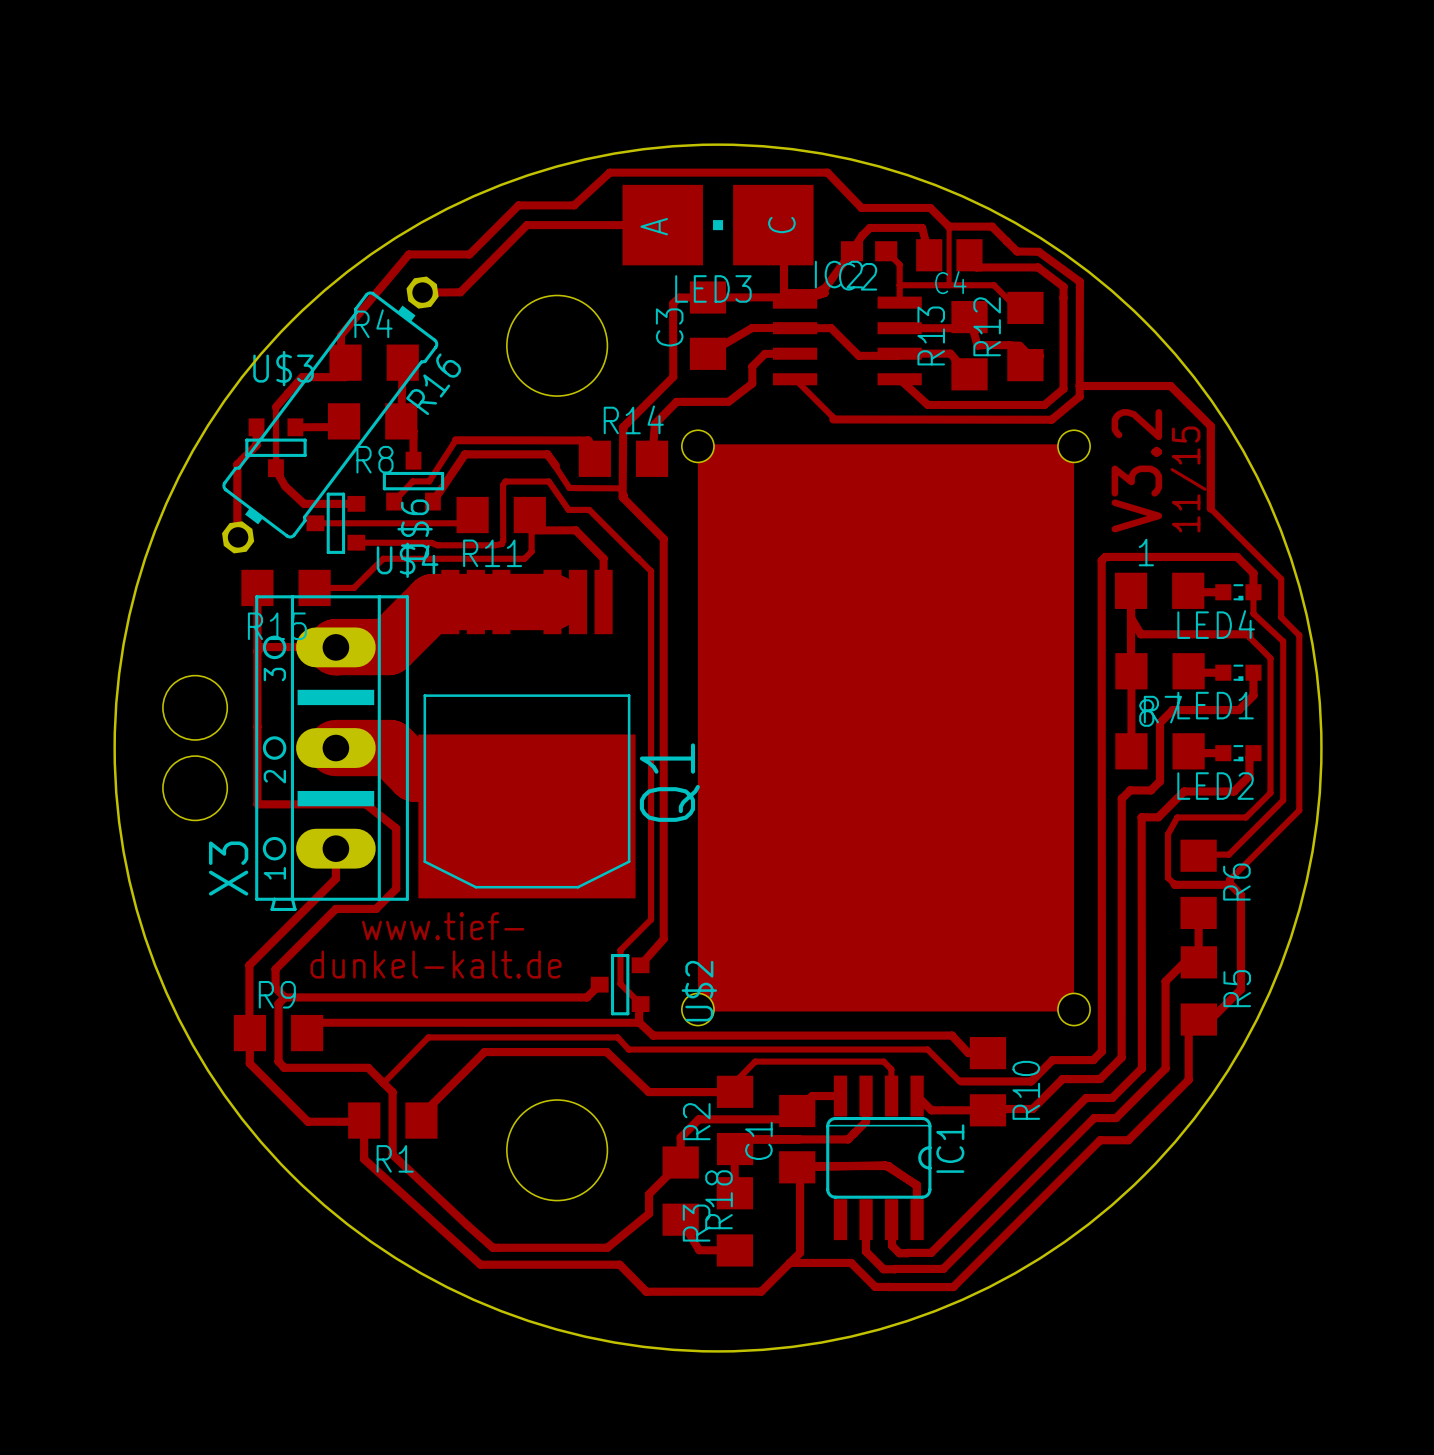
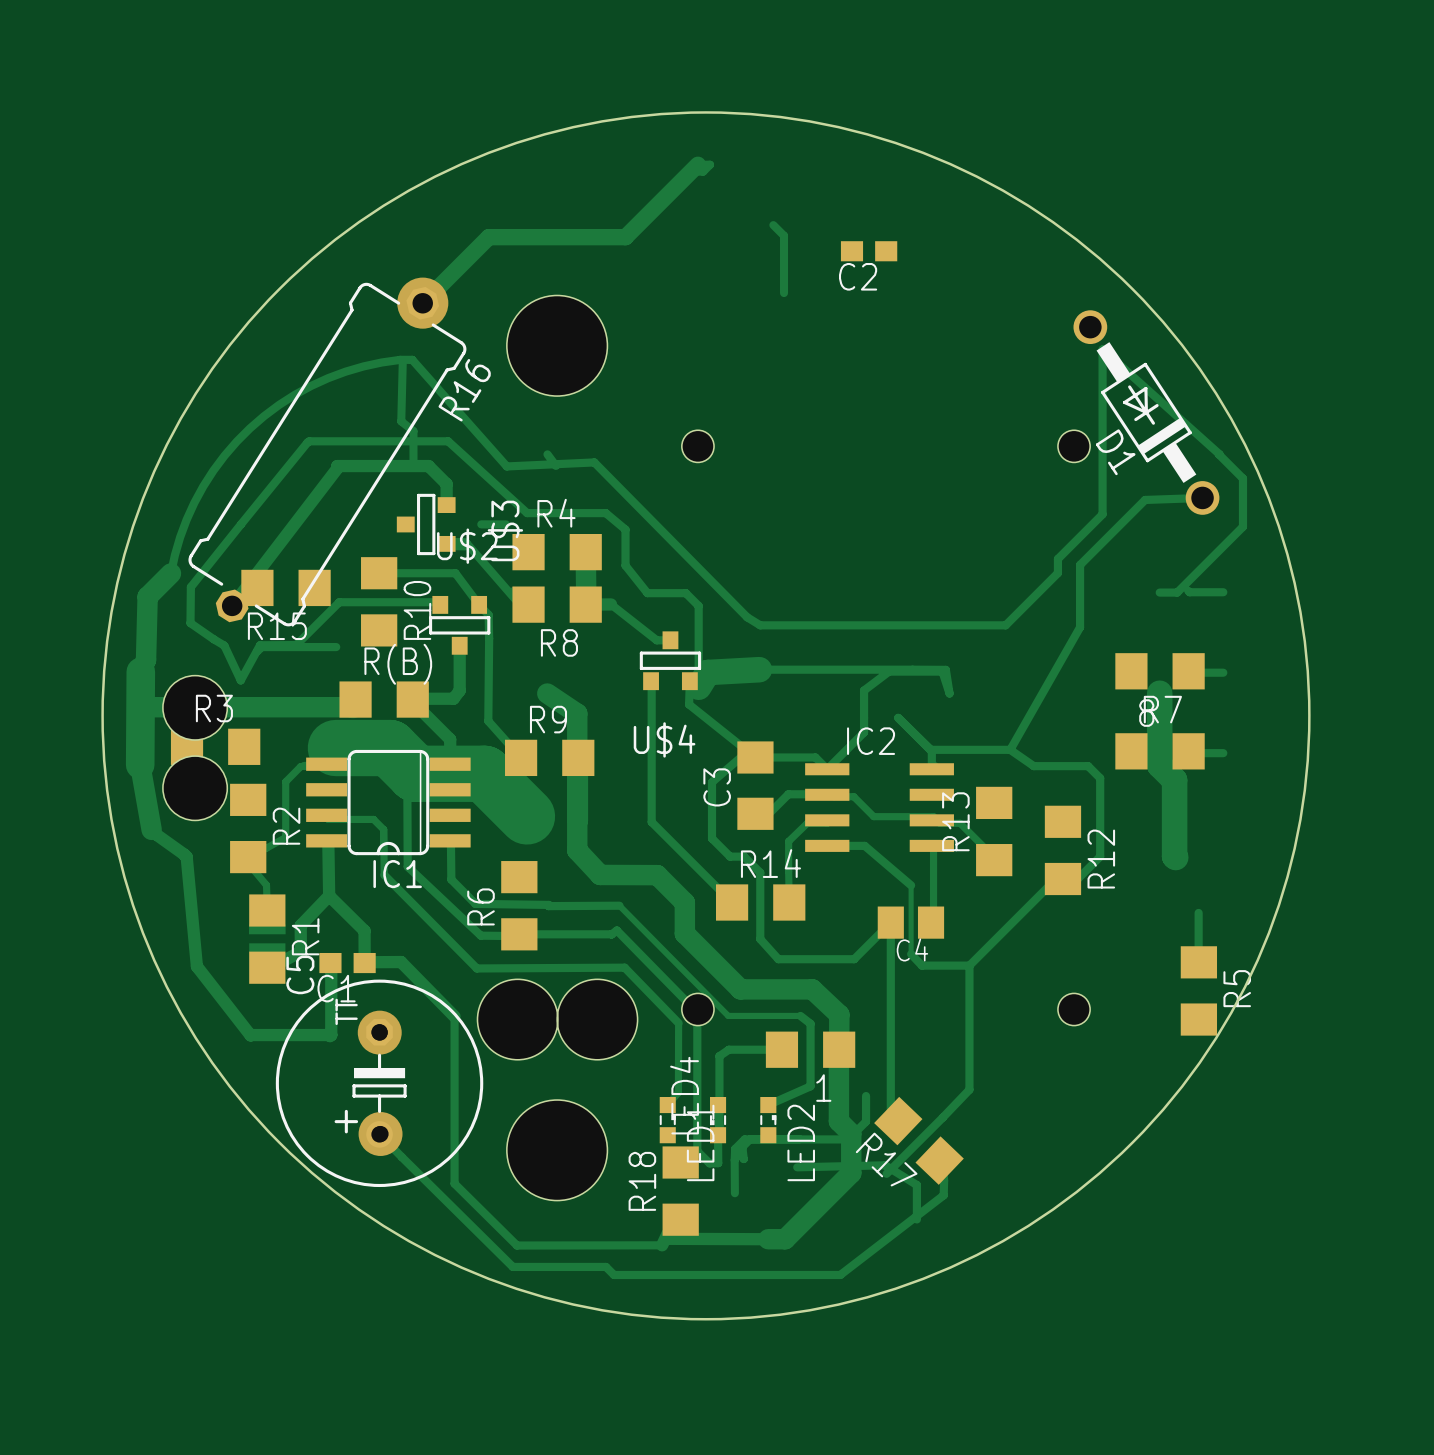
track: none -> (695, 171) (703, 171) (709, 164) (697, 164) (625, 237) (488, 237) (422, 303)
track: (662, 225) (526, 225) (460, 292) (422, 292) -> none
LED3: (718, 225) -> none
track: (948, 226) (930, 207) (861, 207) (827, 172) (609, 172) (574, 205) (518, 205) (469, 254) (408, 254) (341, 335) (340, 363) -> none
track: (948, 226) (992, 226) (1017, 251) (1038, 251) (1079, 281) (1079, 396) (1051, 419) (833, 419) (795, 379) -> none
track: (949, 227) (949, 285) -> none
track: (886, 251) (899, 264) (899, 302) -> none
track: (929, 255) (922, 227) (869, 227) (862, 235) (825, 288) (795, 302) (824, 293) (784, 293) (785, 297) (679, 297) (673, 303) (673, 376) (623, 427) (622, 497) -> none
C4 position: (949, 255) -> (910, 922)
track: (969, 255) (969, 260) (976, 267) (1038, 267) (1063, 286) (1063, 388) (1044, 404) (927, 404) (899, 379) -> none
R16 footprint: [222, 276, 439, 554] -> [188, 282, 467, 627]
track: (899, 285) (993, 285) (1016, 307) (1025, 307) -> none
via: none -> (422, 303)
C3 position: (707, 325) -> (755, 785)
R12 name position: R12 (987, 326) -> R12 (1101, 859)
track: (791, 327) (752, 328) (707, 353) -> none
track: (795, 328) (831, 328) (858, 355) (950, 353) (969, 374) -> none
track: (899, 328) (980, 328) (969, 317) (977, 345) (1019, 345) (1029, 355) (1039, 355) (1029, 364) (1025, 365) -> none
R12 position: (1025, 336) -> (1062, 850)
IC2 position: (847, 340) -> (879, 807)
R13 position: (969, 345) -> (994, 831)
track: (794, 353) (765, 353) (752, 366) (752, 383) (728, 401) (676, 401) (655, 423) (652, 458) (646, 464) -> none
track: (345, 362) (345, 377) (302, 377) (275, 407) (276, 470) (285, 486) (304, 503) (356, 503) -> none
R4 position: (374, 362) -> (557, 552)
R16 name position: R16 (433, 384) -> R16 (464, 390)
track: (1079, 386) (1170, 386) (1210, 426) (1210, 508) (1281, 579) (1281, 617) (1299, 635) (1299, 810) (1229, 879) (1229, 884) -> none
D1: none -> (1146, 412)
track: (344, 421) (341, 427) (295, 427) -> none
R8 position: (372, 421) -> (557, 604)
track: (256, 427) (256, 445) (237, 464) (238, 537) -> none
drawing: [697, 444, 1075, 1012] -> none
U$3 rotation: 0° (275, 447) -> 90° clockwise (426, 524)
U$3 position: (275, 447) -> (426, 524)
track: (594, 458) (588, 440) (455, 440) (429, 481) (412, 481) (394, 501) -> none
R14 position: (623, 458) -> (760, 902)
text: V3.2 (1136, 470) -> none
text: 11/15 (1188, 479) -> none
U$4 position: (413, 481) -> (670, 660)
track: (622, 497) (620, 488) (569, 487) (547, 454) (465, 454) (432, 501) -> none
track: (622, 497) (624, 496) (623, 497) (663, 538) (663, 939) (640, 965) -> none
track: none -> (1202, 497) (1145, 499) (1080, 565) (1080, 627) (1010, 749)
track: none -> (446, 505) (446, 484) (428, 466) (337, 466) (338, 466) (232, 605)
track: (472, 515) (476, 523) (315, 523) -> none
R11: (501, 515) -> none
U$6: (335, 523) -> none
track: none -> (481, 524) (506, 524)
track: (356, 542) (431, 542) (437, 545) (501, 544) (503, 485) (505, 481) (548, 481) (568, 509) (589, 509) (651, 571) (651, 919) (620, 950) (620, 983) (640, 1004) (639, 1022) -> none
track: none -> (446, 543) (466, 543) (516, 601) (513, 591) (528, 604)
track: none -> (585, 552) (585, 604) (611, 604) (656, 640) (670, 640)
1 name position: 1 (1146, 552) -> 1 (823, 1088)
track: none -> (379, 573) (455, 573) (488, 614) (488, 721) (521, 757)
track: (257, 587) (257, 804) (366, 804) (396, 828) (396, 888) (376, 908) (335, 908) (275, 969) (275, 988) (284, 997) -> none
track: (314, 587) (354, 587) (383, 558) (524, 558) (531, 551) (531, 517) (529, 515) (531, 530) (575, 530) (603, 558) (603, 602) -> none
track: (1131, 590) (1131, 751) -> none
1 position: (1159, 590) -> (810, 1049)
track: none -> (1159, 592) (1177, 592) (1242, 526) (1242, 478) (1219, 454) (1102, 349) (1102, 514) (1057, 558) (1057, 573) (1005, 625) (760, 625) (747, 617) (594, 462) (506, 466) (412, 359) (400, 359) (363, 366) (311, 385) (264, 416) (224, 455) (203, 486) (186, 519) (170, 573) (147, 596) (146, 659) (140, 671) (140, 764) (151, 829) (186, 856) (196, 966) (250, 1035) (331, 1035)
LED4 rotation: 0° (1238, 592) -> 90° clockwise (718, 1120)
LED4 position: (1238, 592) -> (718, 1120)
track: none -> (442, 602) (339, 602) (296, 645) (260, 645) (240, 680) (224, 646) (190, 623) (190, 587) (307, 442) (448, 441) (527, 513) (605, 513) (625, 529) (625, 565) (647, 593) (685, 593) (698, 605) (698, 687) (707, 672) (759, 669) (945, 669) (949, 693) (942, 671) (889, 671) (864, 690) (864, 732) (827, 769) (815, 757) (740, 757) (712, 782) (712, 838) (730, 856) (744, 856) (760, 872) (760, 939) (778, 959) (854, 959) (890, 922) (890, 1124) (898, 1121)
track: (552, 602) (433, 602) (388, 647) (335, 647) -> none
track: (1131, 617) (1140, 634) (1249, 634) (1249, 637) (1270, 658) (1270, 793) (1245, 817) (1177, 817) (1167, 834) (1167, 877) (1174, 884) (1230, 884) (1240, 894) (1240, 989) (1210, 1019) (1198, 1019) (1188, 1029) (1188, 1079) (1128, 1140) (1100, 1140) (953, 1287) (875, 1286) (851, 1262) (789, 1262) -> none
track: none -> (459, 645) (459, 690) (453, 698) (410, 699) (450, 739) (450, 764) (417, 764) (407, 774) (407, 866) (480, 935) (611, 934)
LED1 rotation: 0° (1238, 672) -> 90° counterclockwise (667, 1120)
LED1 position: (1238, 672) -> (667, 1120)
track: (1253, 672) (1253, 695) (1238, 710) (1172, 710) (1160, 722) (1160, 781) (1150, 790) (1130, 790) (1121, 798) (1121, 1057) (1100, 1079) (1062, 1079) (1032, 1109) (931, 1110) (917, 1096) -> none
track: none -> (651, 681) (651, 822) (732, 902)
track: none -> (689, 681) (689, 704) (755, 757)
track: none -> (547, 693) (577, 713) (577, 850) (600, 874) (657, 875) (684, 902) (684, 933) (740, 989) (812, 989) (839, 1014) (839, 1049)
track: none -> (1159, 693) (1159, 765) (1174, 780) (1175, 857)
R(B): none -> (384, 699)
track: none -> (355, 702) (358, 702) (352, 708) (142, 707)
Q1: (526, 734) -> none
round board edge position: (718, 748) -> (705, 715)
track: none -> (1010, 749) (931, 749) (898, 717) (931, 751) (931, 769) (934, 766)
track: none -> (1010, 749) (1033, 766) (1088, 766) (1100, 778) (1100, 856) (1077, 879) (1056, 879) (969, 965)
X3: (332, 753) -> none
LED2 rotation: 0° (1238, 753) -> 90° counterclockwise (768, 1120)
LED2 position: (1238, 753) -> (768, 1120)
track: (1253, 753) (1249, 757) (1249, 775) (1233, 791) (1184, 791) (1158, 817) (1141, 817) (1141, 1068) -> none
track: none -> (326, 764) (300, 766) (285, 781) (285, 837) (248, 857) (248, 863) (266, 885) (267, 910)
track: none -> (755, 813) (768, 813) (788, 794) (853, 796) (873, 816) (933, 816) (931, 820) (940, 823) (960, 823) (986, 849) (999, 849) (994, 860)
track: none -> (326, 815) (328, 819) (373, 819) (383, 829)
track: none -> (827, 820) (827, 823) (807, 823) (788, 841) (789, 902)
track: none -> (383, 829) (384, 875) (476, 968) (624, 967) (678, 1023) (678, 1092) (667, 1105)
track: none -> (326, 840) (328, 844) (329, 895)
track: none -> (450, 841) (451, 879) (475, 903) (619, 905) (728, 1015) (800, 1015) (810, 1023) (810, 1086) (768, 1105)
track: none -> (827, 845) (864, 845) (911, 885) (911, 954) (921, 965) (969, 965)
track: none -> (931, 845) (933, 849) (933, 922)
track: (335, 848) (335, 878) (249, 965) (249, 1063) (307, 1121) (365, 1121) (364, 1120) -> none
track: (1198, 855) (1228, 854) (1283, 800) (1283, 641) (1253, 613) (1253, 573) (1237, 556) (1105, 556) (1101, 560) (1101, 1051) (1093, 1060) (1052, 1060) (1031, 1081) (959, 1081) (927, 1049) (628, 1049) (617, 1037) (428, 1037) (383, 1083) -> none
R6 name position: R6 (1236, 882) -> R6 (481, 906)
R6 position: (1198, 884) -> (519, 905)
track: none -> (329, 895) (364, 930) (364, 963)
track: none -> (329, 895) (300, 925) (300, 951) (260, 973)
drawing: none -> [249, 924, 286, 952]
text: www.tief- (443, 926) -> none
track: none -> (611, 934) (616, 930) (697, 1012) (697, 1151) (709, 1163) (718, 1163) (718, 1135)
track: none -> (365, 962) (401, 962) (454, 1016) (454, 1183) (517, 1245) (662, 1245) (667, 1233) (667, 1239) (785, 1239) (851, 1173) (851, 1133) (838, 1121) (838, 1049)
track: (1198, 962) (1184, 962) (1165, 981) (1165, 1068) (1116, 1118) (1094, 1118) (943, 1268) (883, 1269) (865, 1251) (865, 1219) -> none
track: none -> (330, 963) (331, 1035)
text: dunkel-kalt.de (436, 964) -> none
track: none -> (969, 965) (969, 1089) (886, 1173)
track: (599, 984) (586, 997) (284, 997) -> none
U$2 rotation: 0° (620, 984) -> 90° counterclockwise (459, 625)
U$2 position: (620, 984) -> (459, 625)
track: (284, 997) (278, 1003) (278, 1061) (284, 1067) (368, 1067) (392, 1092) (392, 1154) (492, 1247) (607, 1247) (649, 1213) (649, 1194) (680, 1162) (680, 1137) (698, 1119) (788, 1119) (812, 1096) (841, 1095) -> none
hole: none -> (517, 1019)
hole: none -> (597, 1019)
track: (639, 1022) (653, 1035) (952, 1035) (968, 1053) (987, 1053) -> none
track: (639, 1022) (305, 1022) (307, 1033) -> none
via: none -> (379, 1032)
R9 position: (278, 1033) -> (549, 757)
track: none -> (781, 1049) (728, 1049) (719, 1056) (719, 1130) (718, 1105)
track: (1141, 1068) (1112, 1098) (1086, 1098) (931, 1252) (899, 1253) (892, 1245) (891, 1219) -> none
R10 position: (987, 1081) -> (379, 601)
C5: none -> (379, 1083)
track: (735, 1091) (735, 1082) (755, 1061) (883, 1061) (891, 1069) (891, 1095) -> none
track: (734, 1092) (648, 1092) (606, 1052) (484, 1052) (423, 1112) (421, 1120) -> none
C1 footprint: [779, 1094, 816, 1184] -> [319, 952, 376, 974]
track: (364, 1120) (364, 1159) (480, 1264) (619, 1264) (646, 1291) (761, 1291) (800, 1252) (800, 1167) (801, 1166) (888, 1166) (916, 1185) -> none
R1 rotation: 0° (392, 1120) -> 90° clockwise (267, 939)
R1 position: (392, 1120) -> (267, 939)
R2 position: (735, 1120) -> (248, 828)
R2 name position: R2 (696, 1121) -> R2 (286, 826)
track: none -> (379, 1134) (512, 1266) (606, 1266) (614, 1274) (840, 1274) (943, 1195) (942, 1161) (939, 1160)
via: none -> (380, 1134)
R17: none -> (918, 1140)
IC1 rotation: 0° (878, 1157) -> 90° clockwise (388, 802)
IC1 position: (878, 1157) -> (388, 802)
R1 name position: R1 (395, 1158) -> R1 (305, 936)
R18 name position: R18 (719, 1199) -> R18 (642, 1181)
track: (680, 1219) (699, 1250) (734, 1250) -> none
R3 rotation: 0° (734, 1221) -> 90° clockwise (215, 746)
R3 position: (734, 1221) -> (215, 746)

